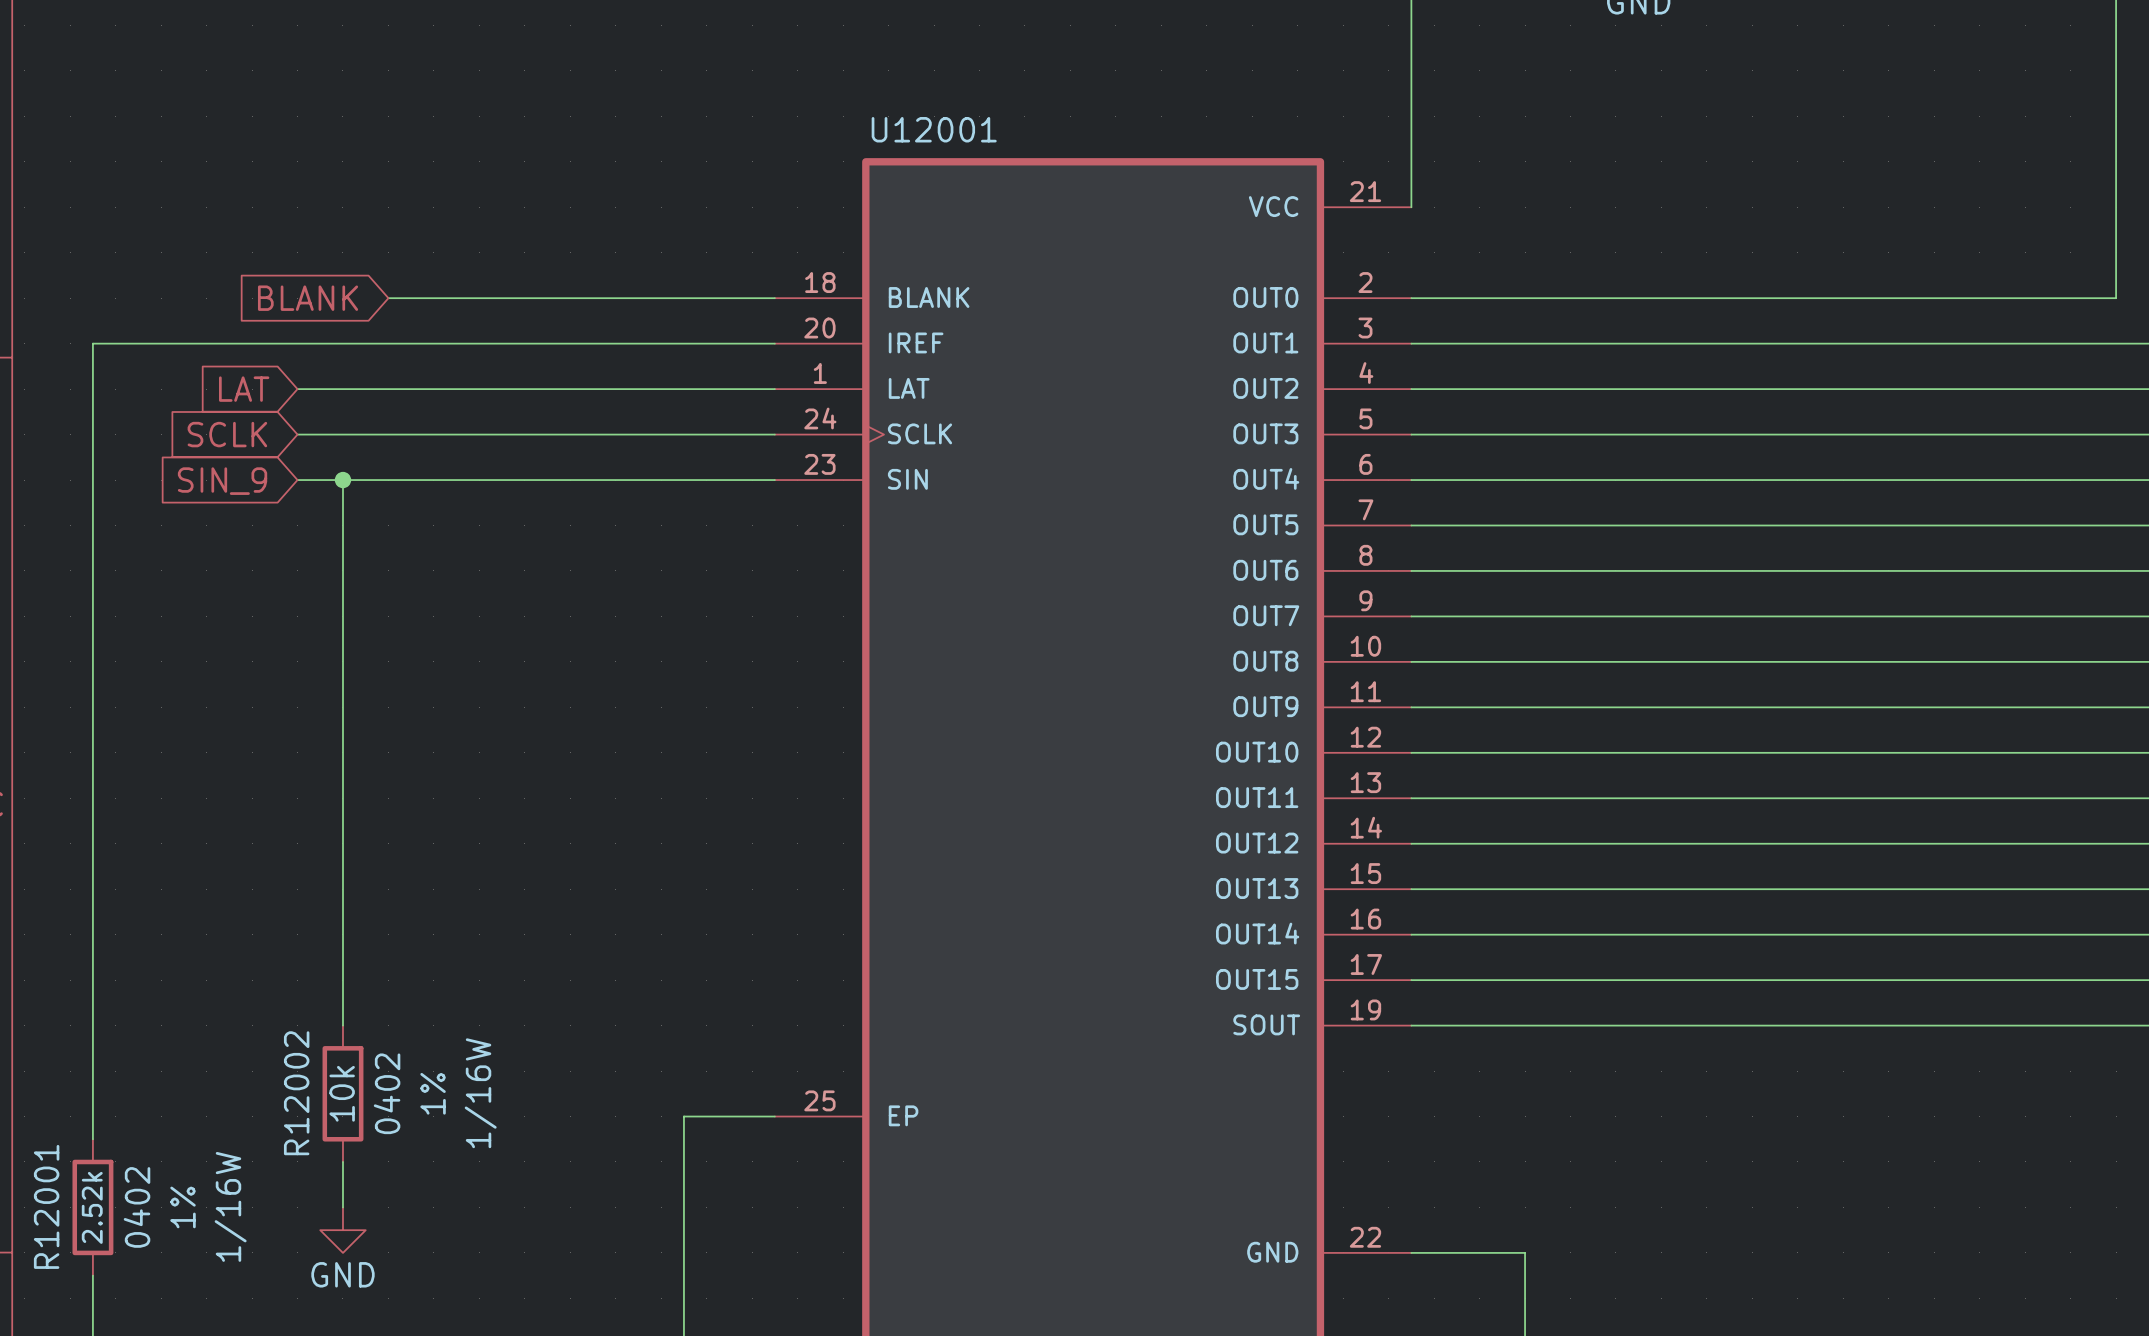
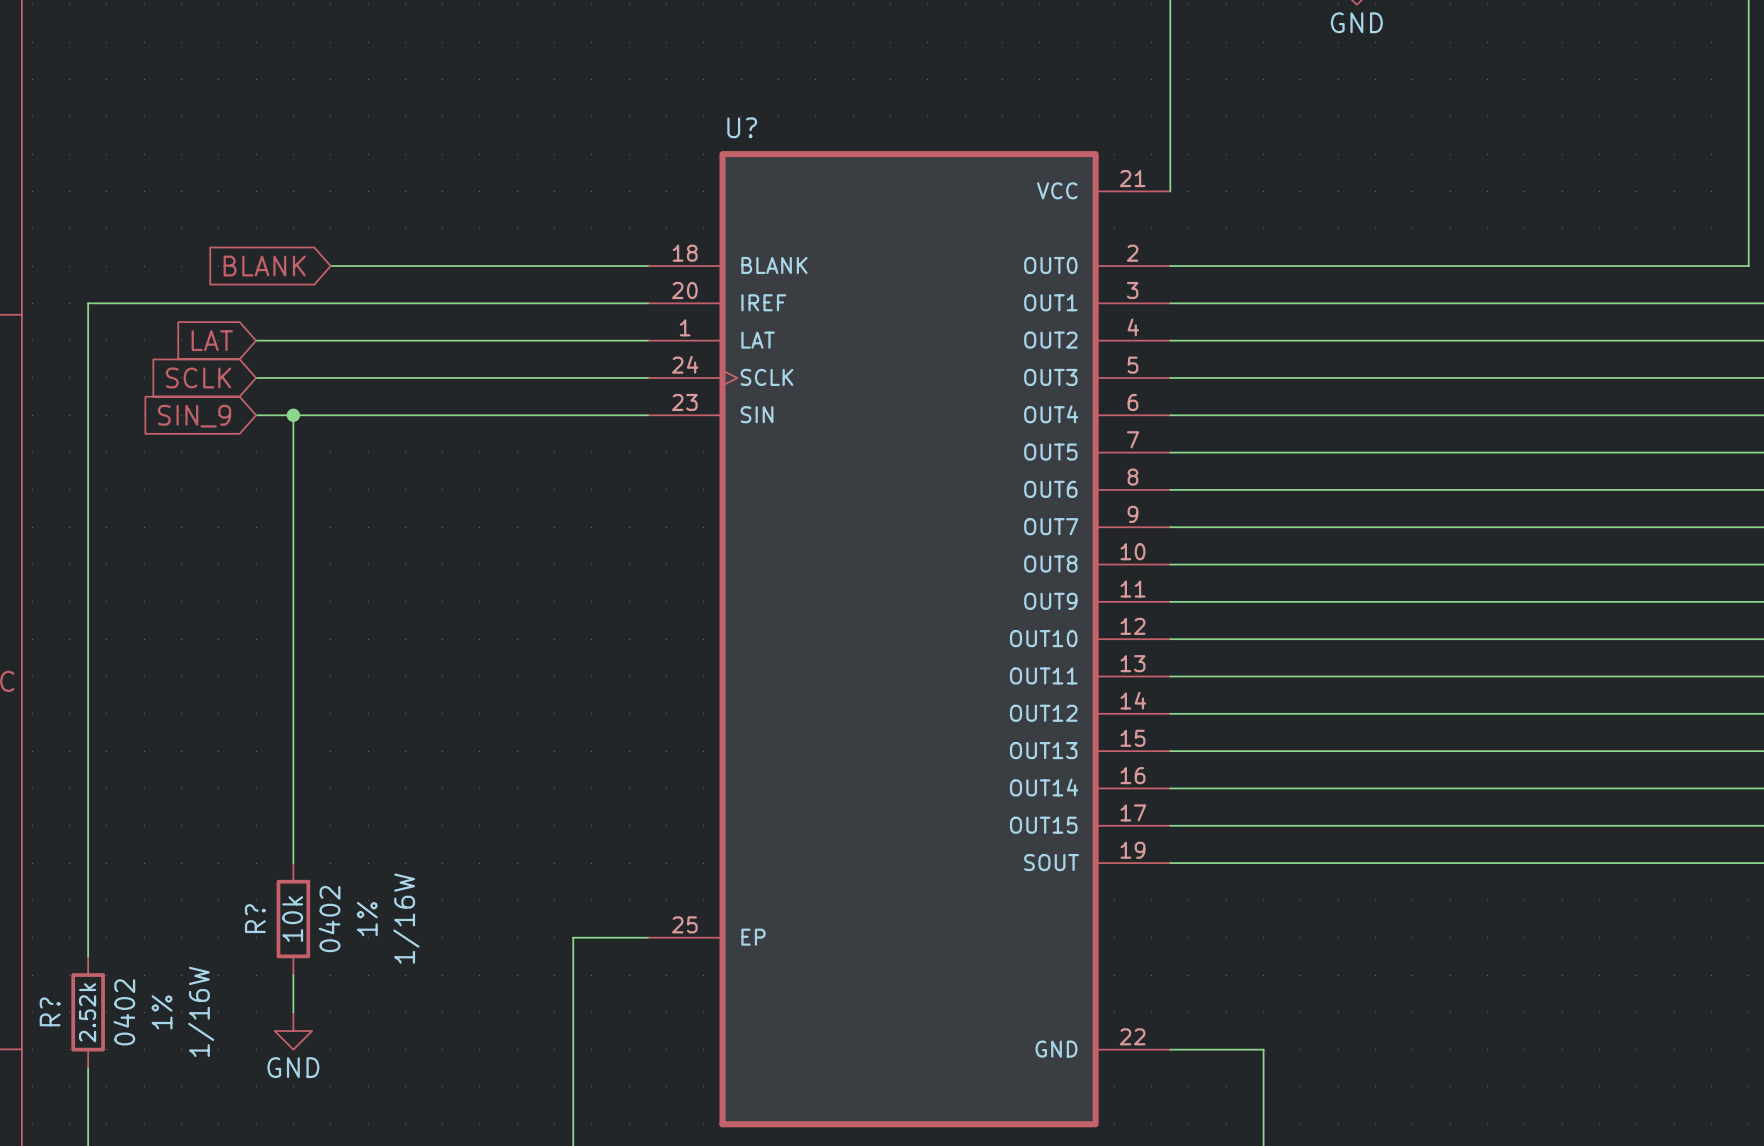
U12001 name: U12001 (934, 129) -> U? (742, 127)
R12002 name: R12002 (296, 1093) -> R? (255, 918)
R12001 name: R12001 (46, 1206) -> R? (50, 1011)

